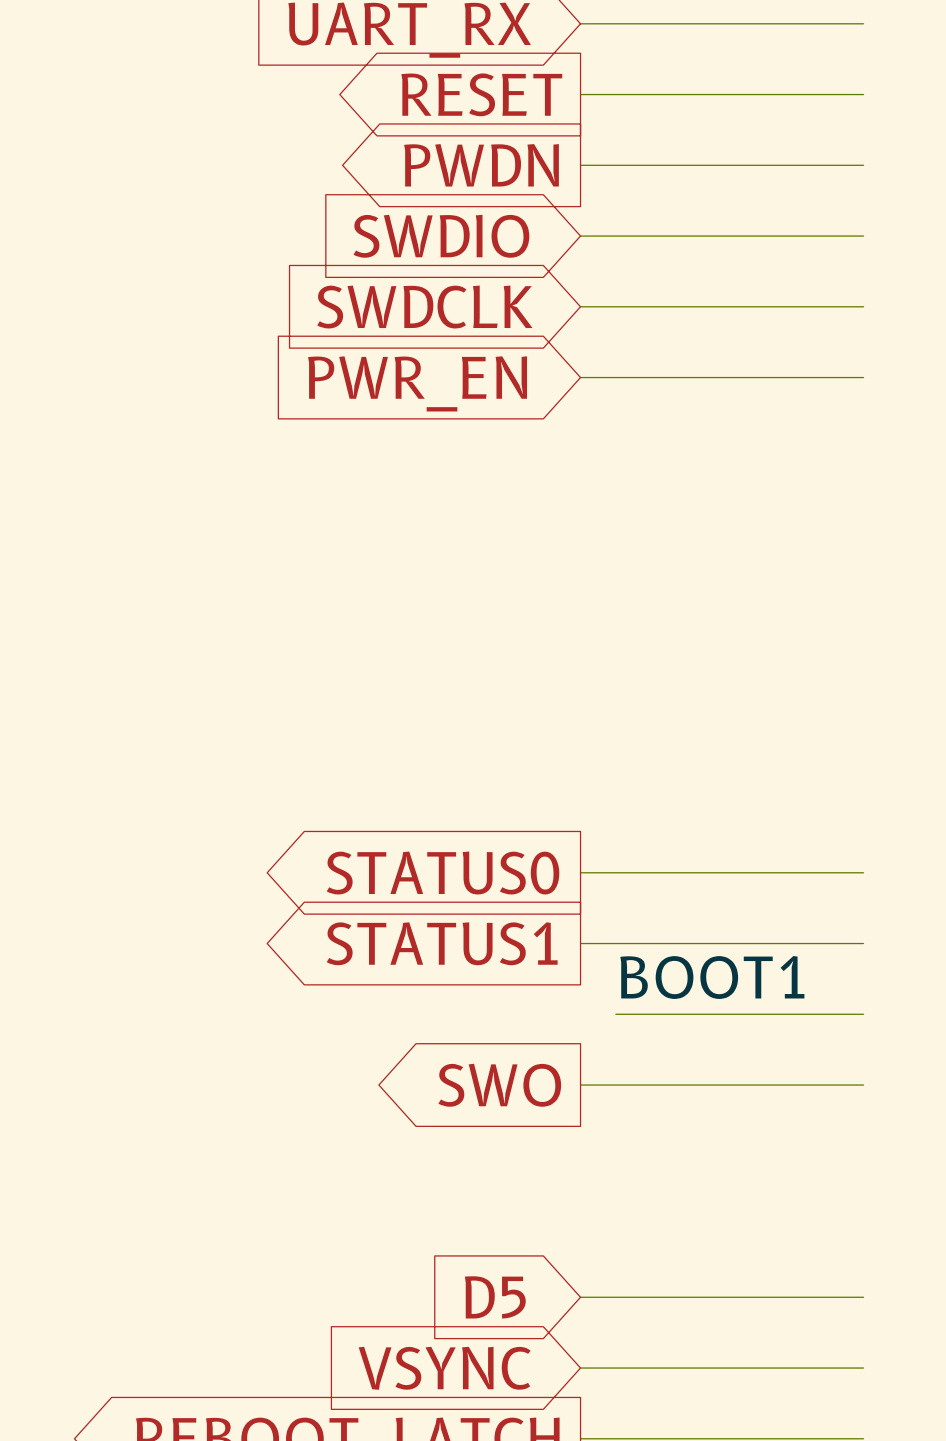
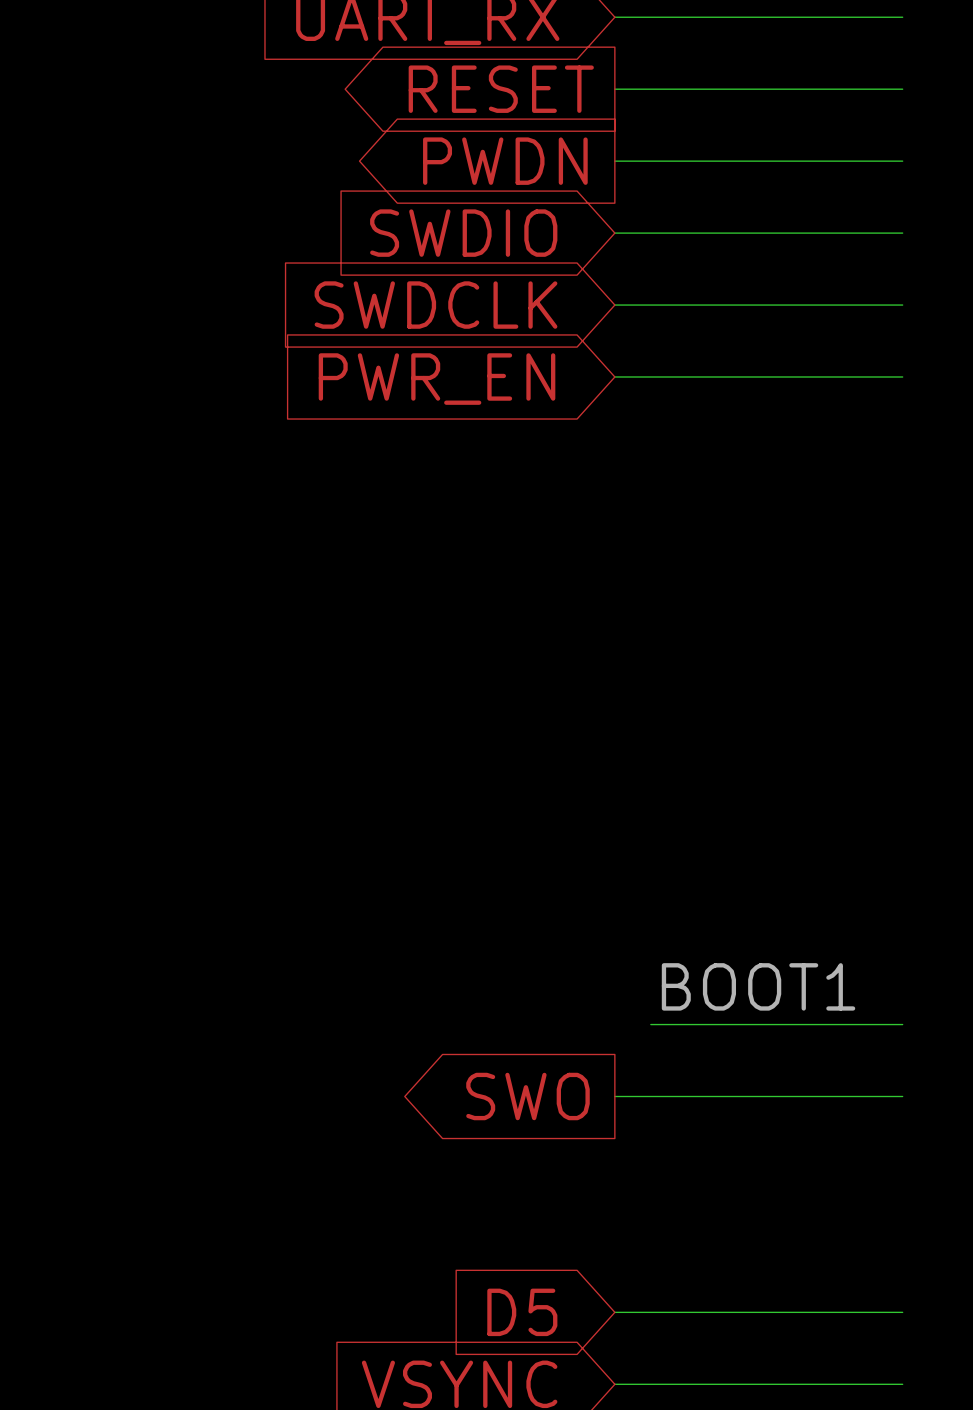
wire: (580, 872) (863, 872) -> none
global label: STATUS0 (443, 873) -> none
global label: STATUS1 (442, 943) -> none
wire: (580, 943) (863, 943) -> none

